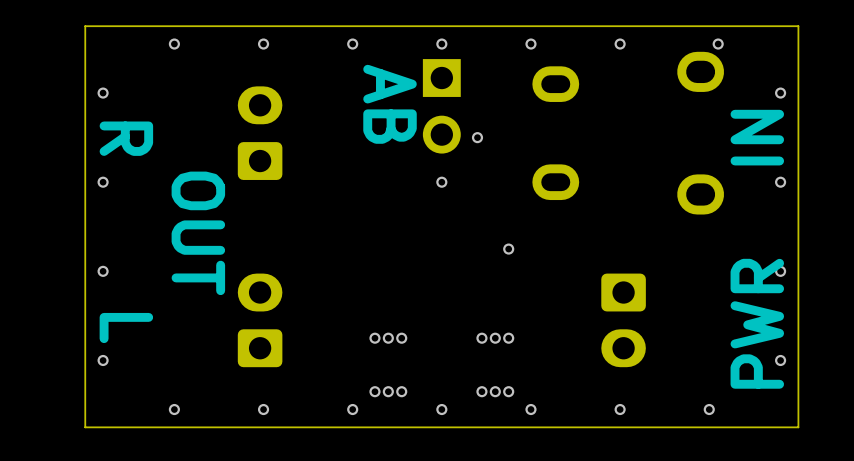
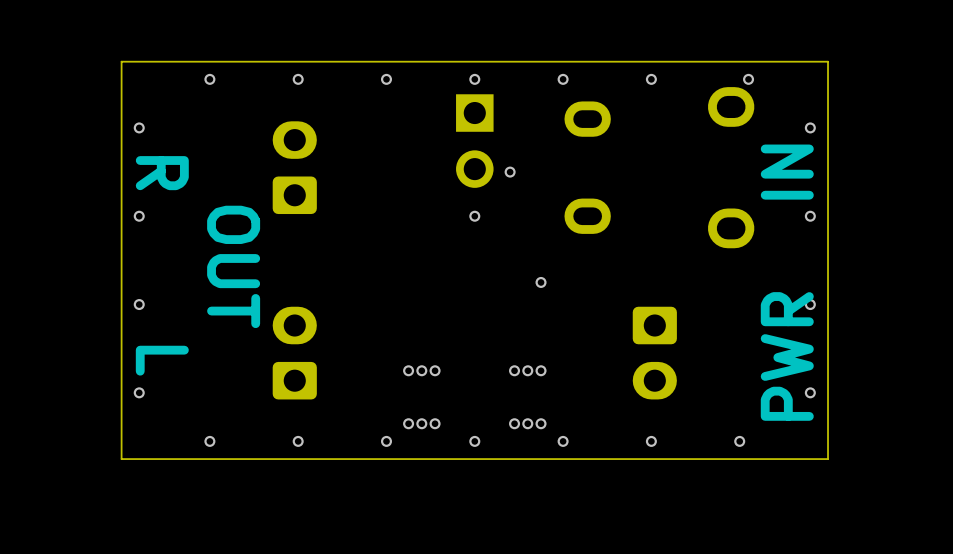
text: AB (390, 104) -> none

